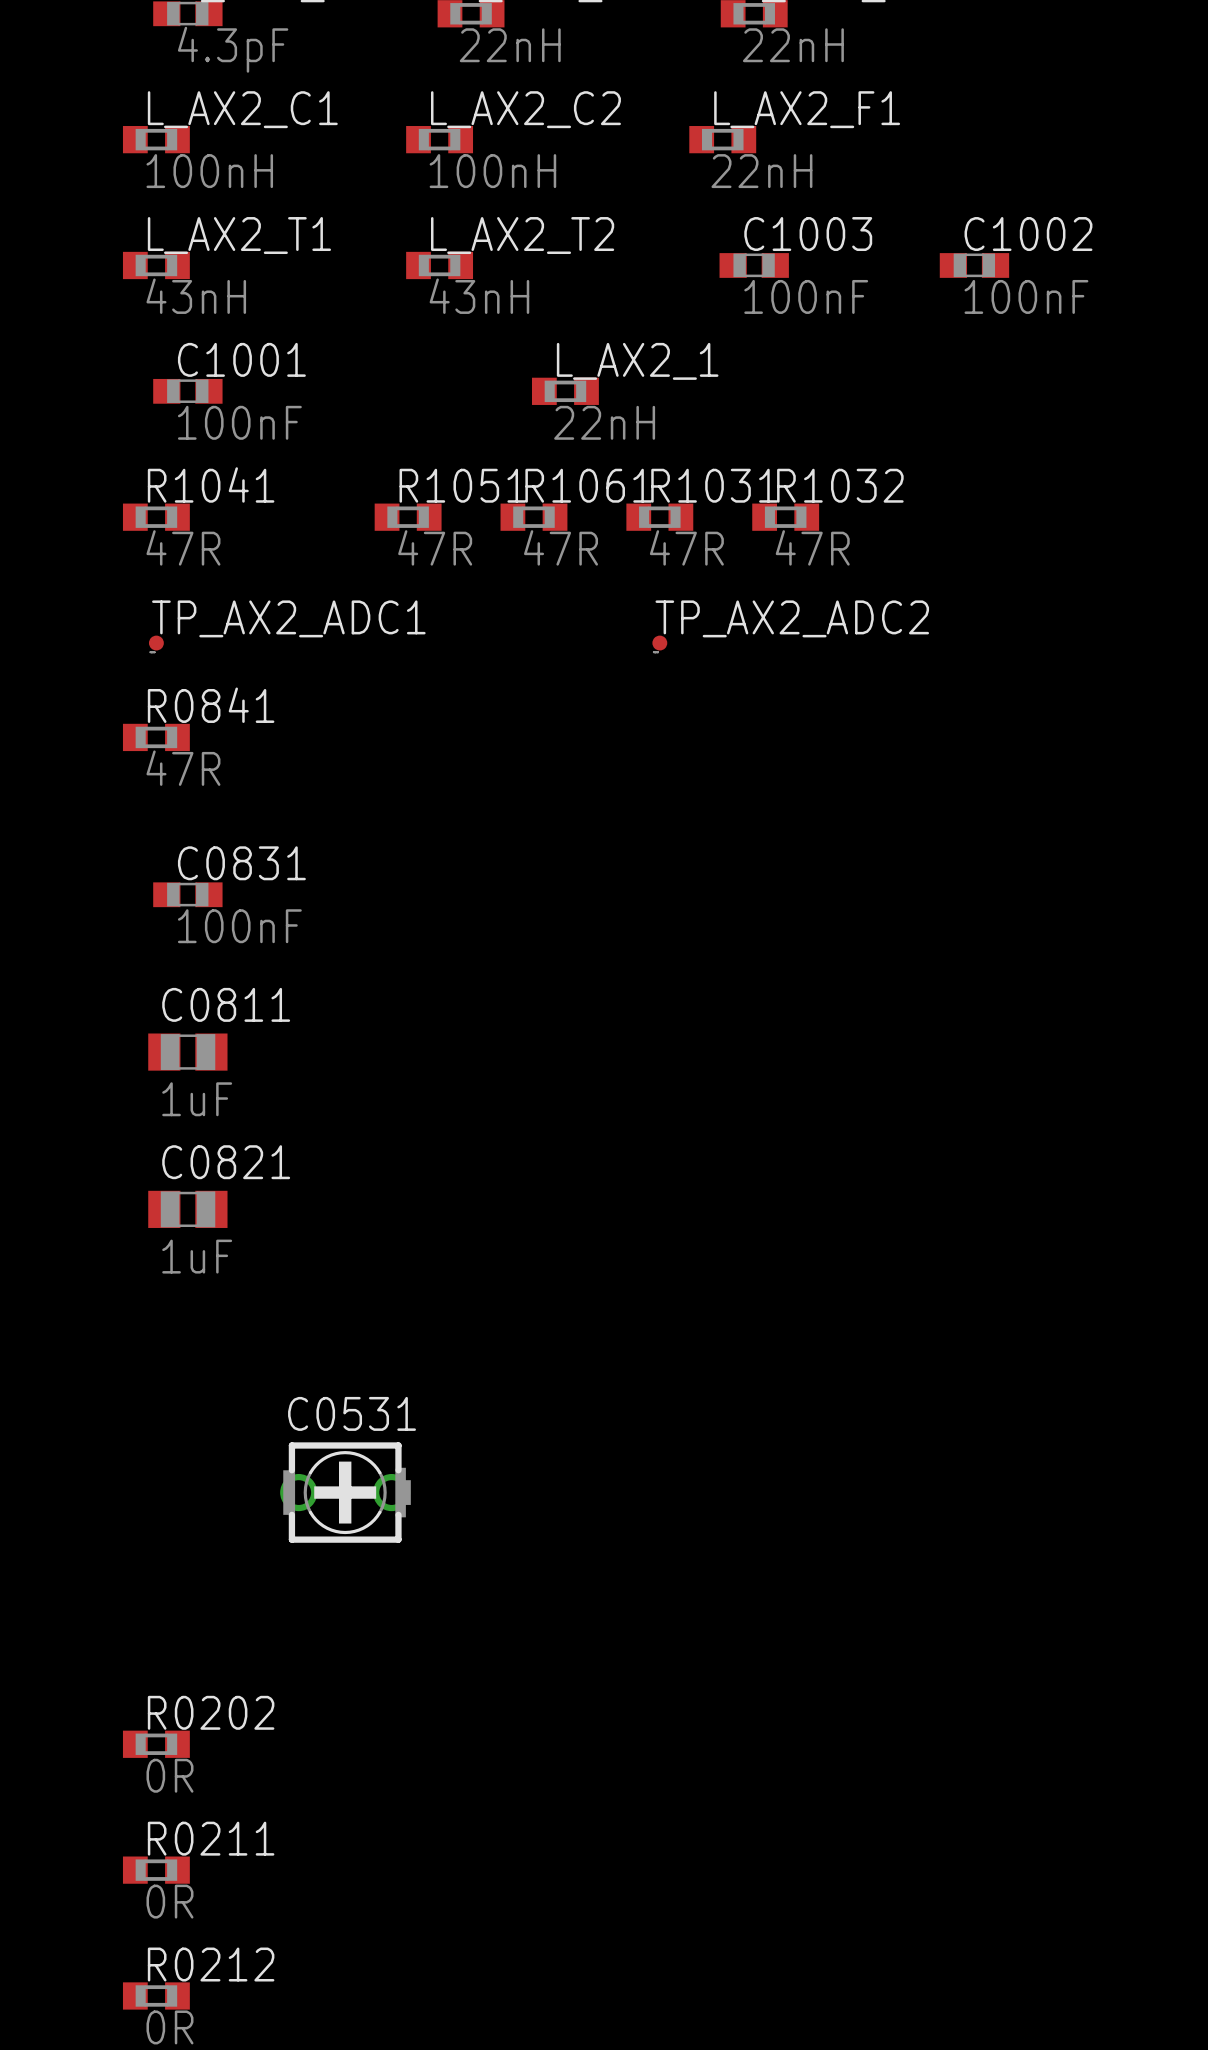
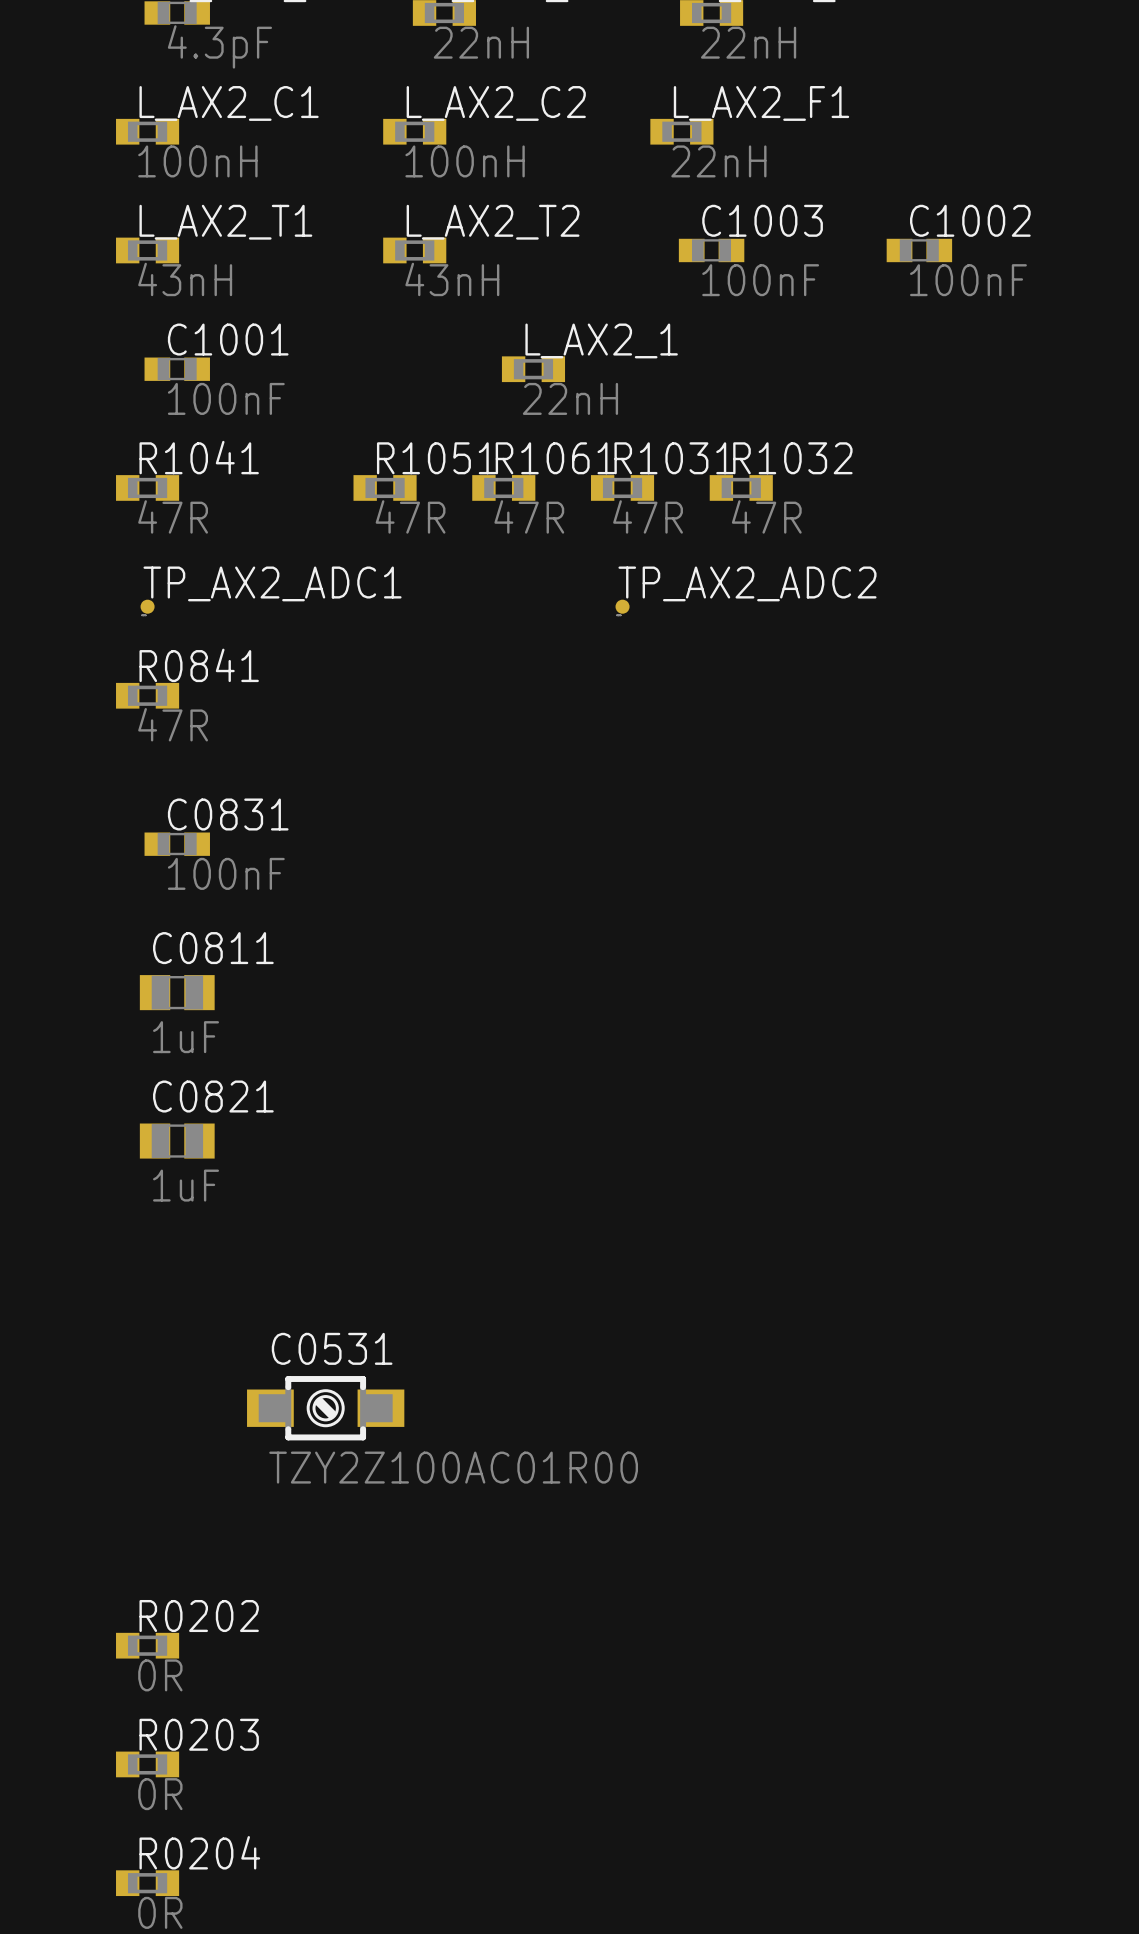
C0531 footprint: [280, 1442, 411, 1543] -> [247, 1376, 405, 1441]
C0531 value: none -> TZY2Z100AC01R00 (453, 1467)
R0211 name: R0211 (211, 1838) -> R0203 (199, 1734)
R0212 name: R0212 (211, 1964) -> R0204 (199, 1852)

